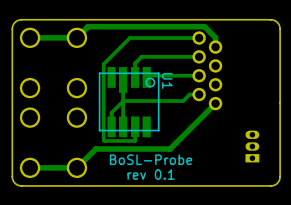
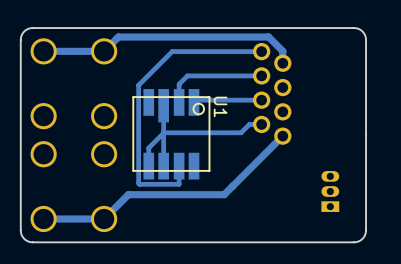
text: BoSL-Probe (151, 159) -> none
text: rev 0.1 (151, 174) -> none

